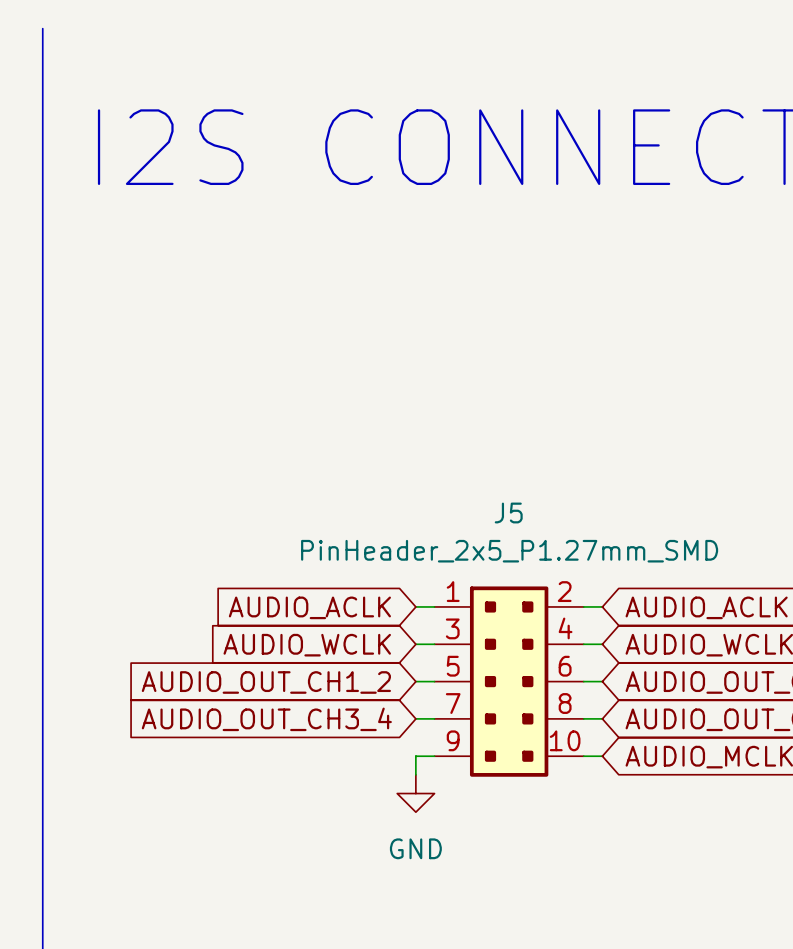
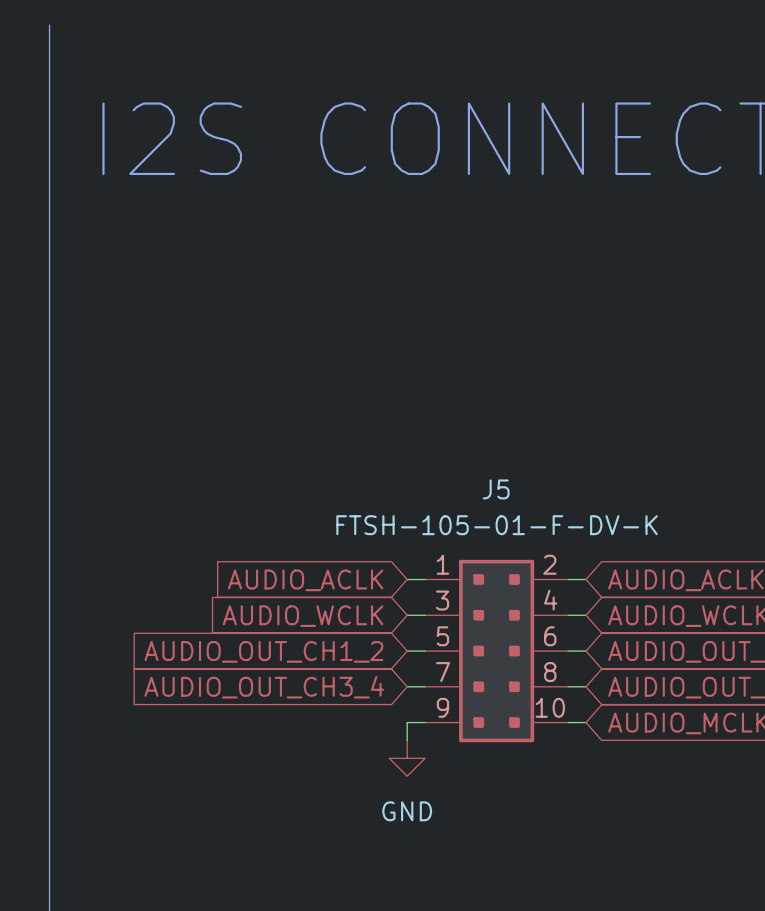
J5 value: PinHeader_2x5_P1.27mm_SMD (509, 551) -> FTSH-105-01-F-DV-K (497, 525)

